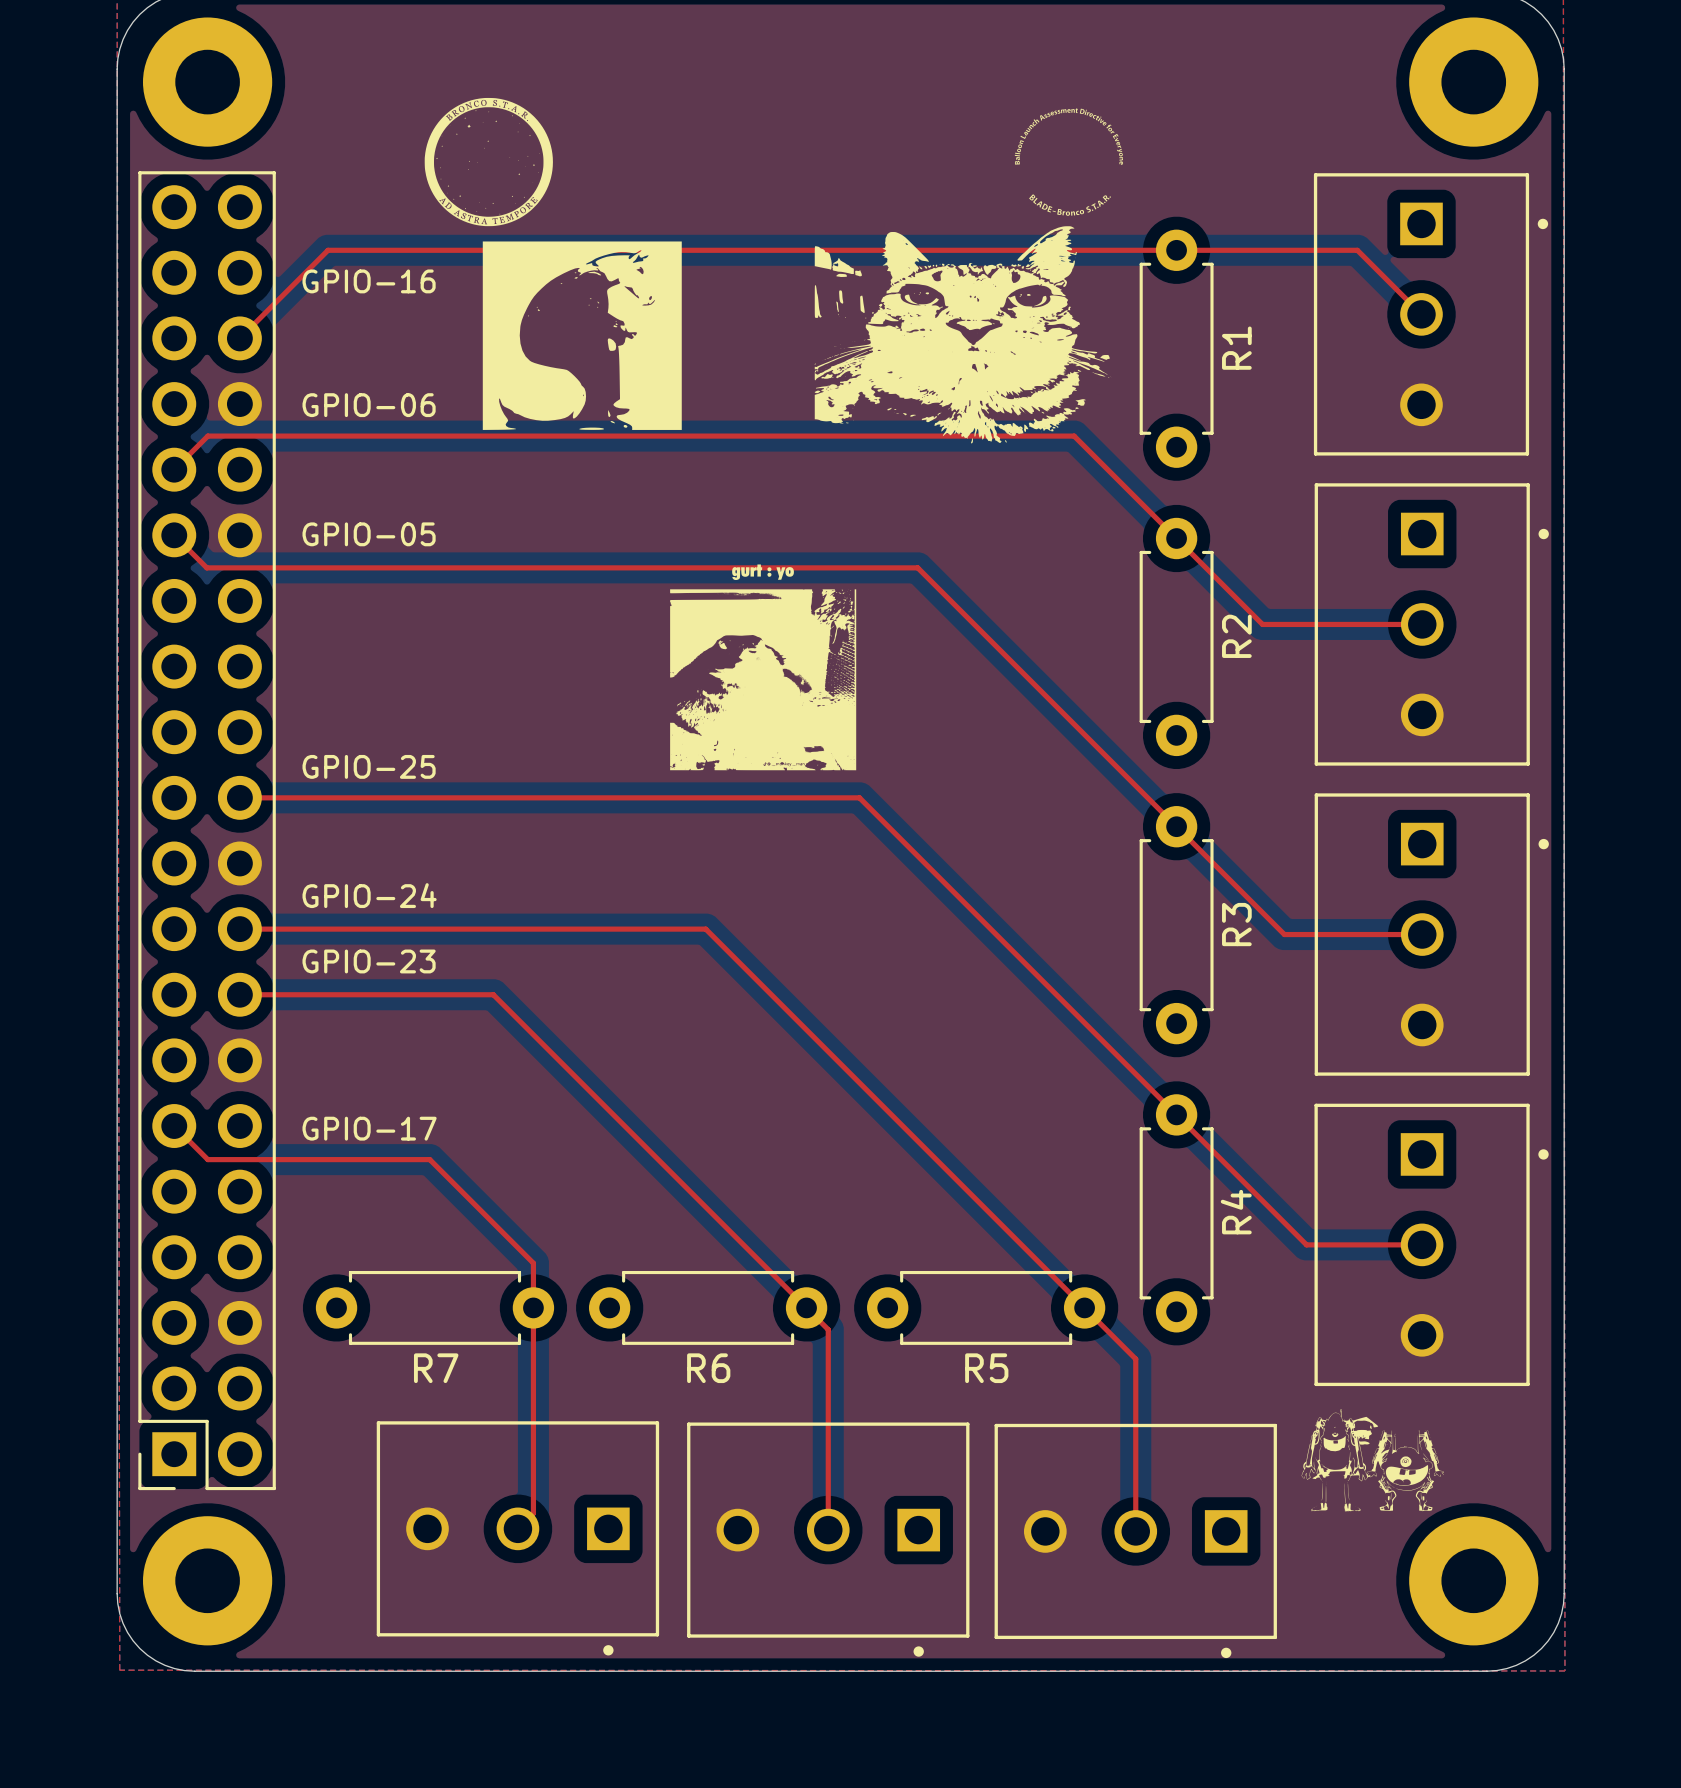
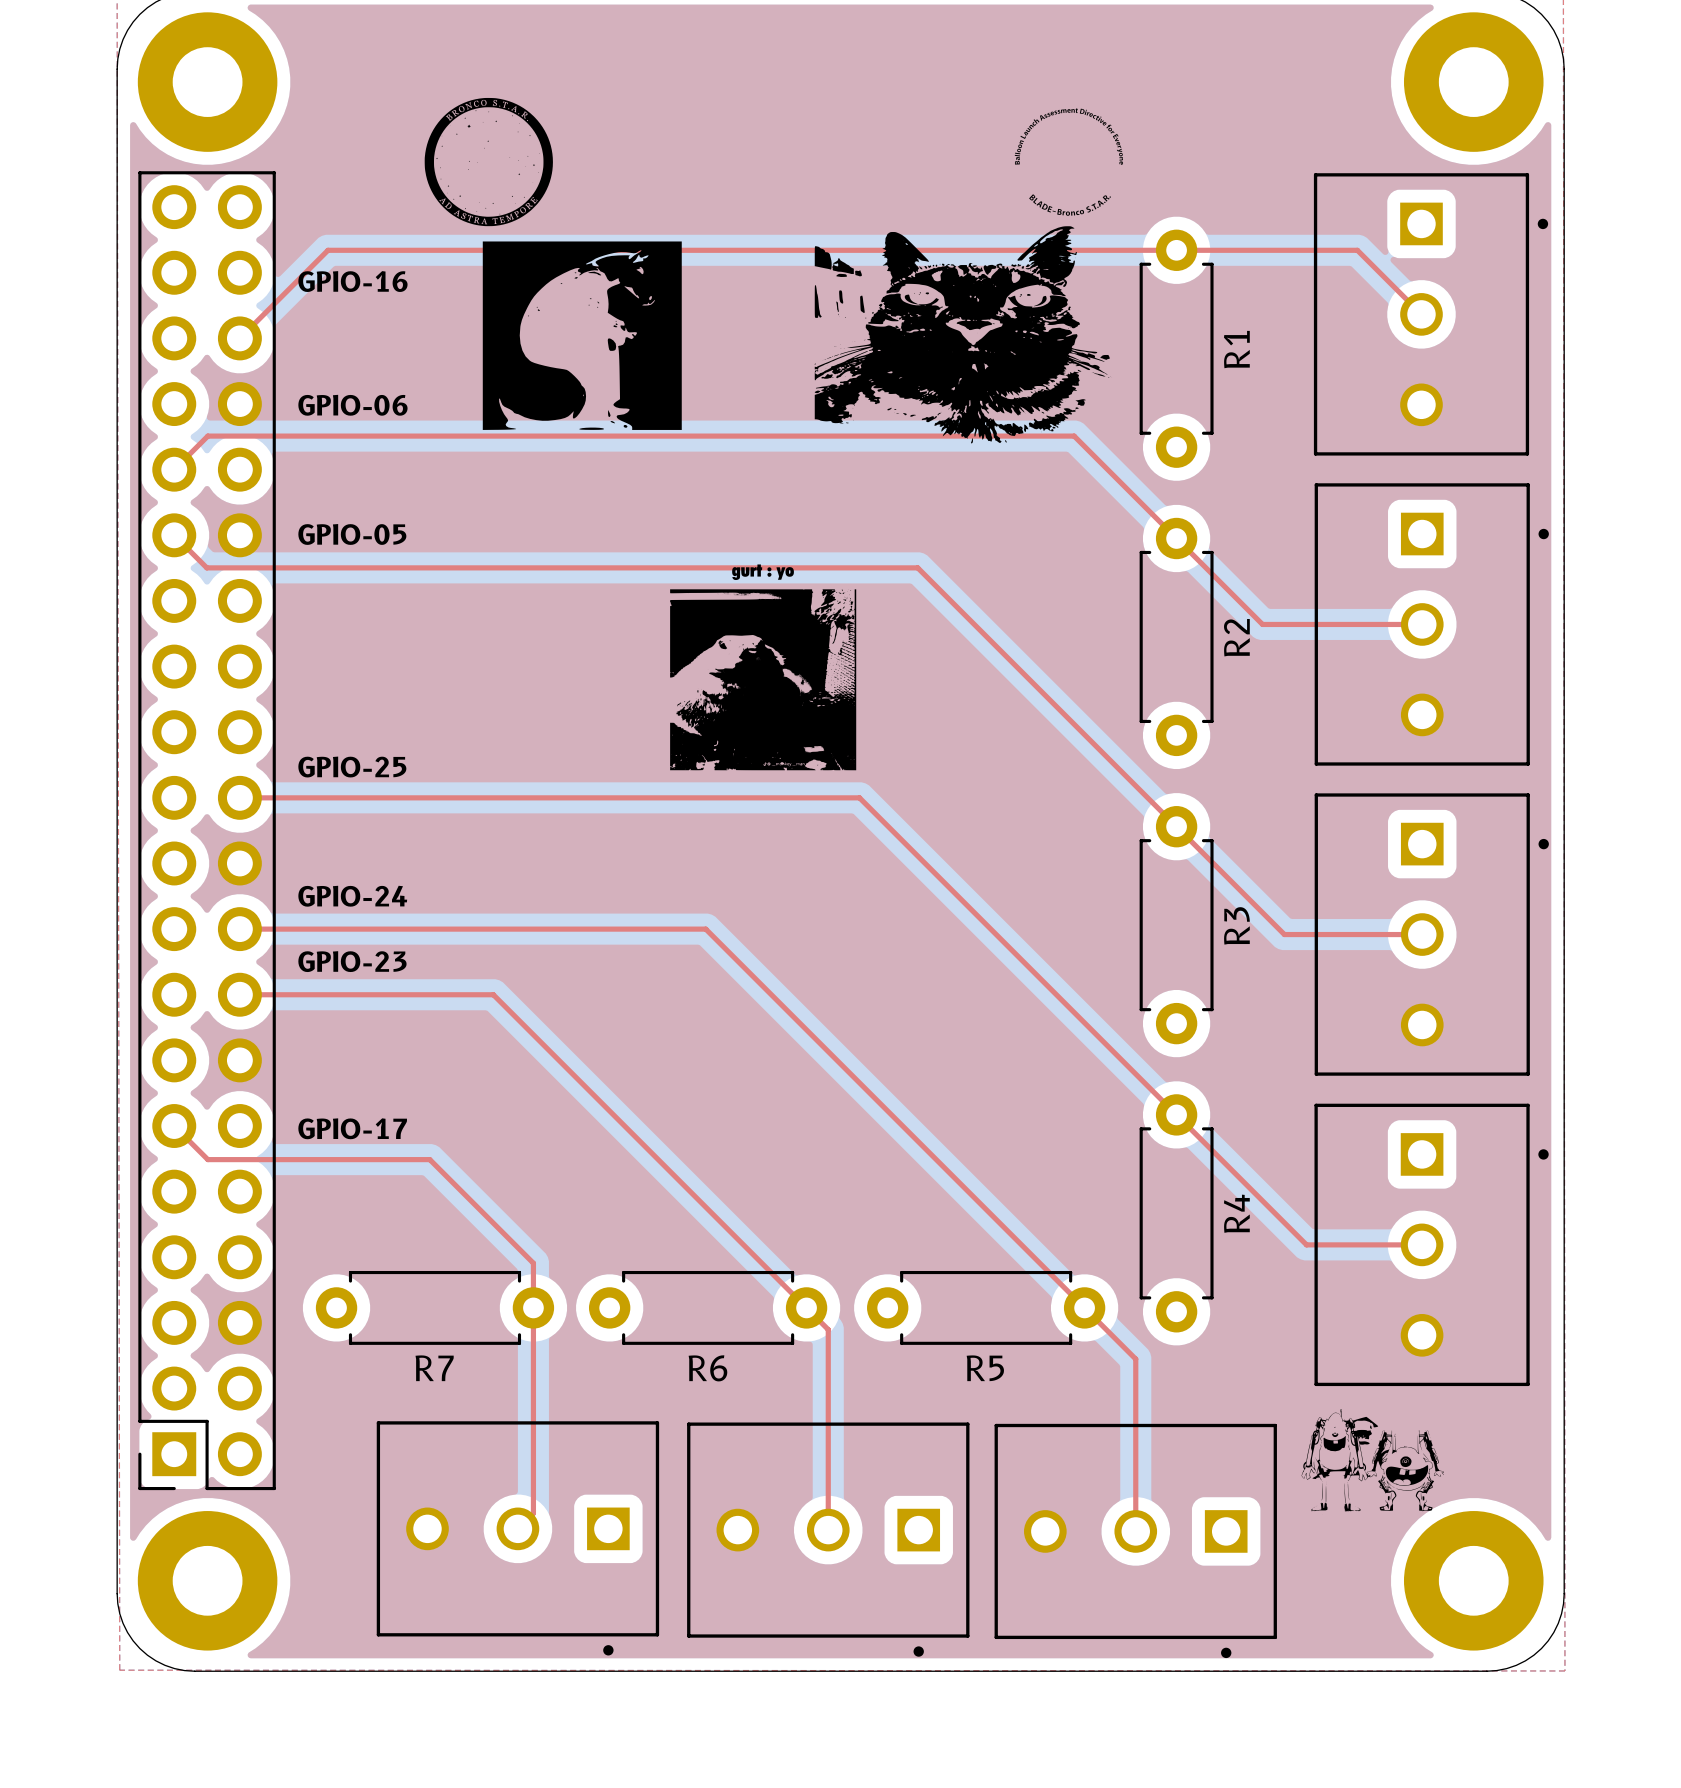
part footprint: [142, 17, 273, 147] -> [137, 12, 278, 152]
part footprint: [1409, 17, 1539, 147] -> [1403, 12, 1544, 152]
part footprint: [142, 1516, 273, 1646] -> [137, 1511, 278, 1651]
part footprint: [1409, 1516, 1539, 1646] -> [1403, 1511, 1544, 1651]

